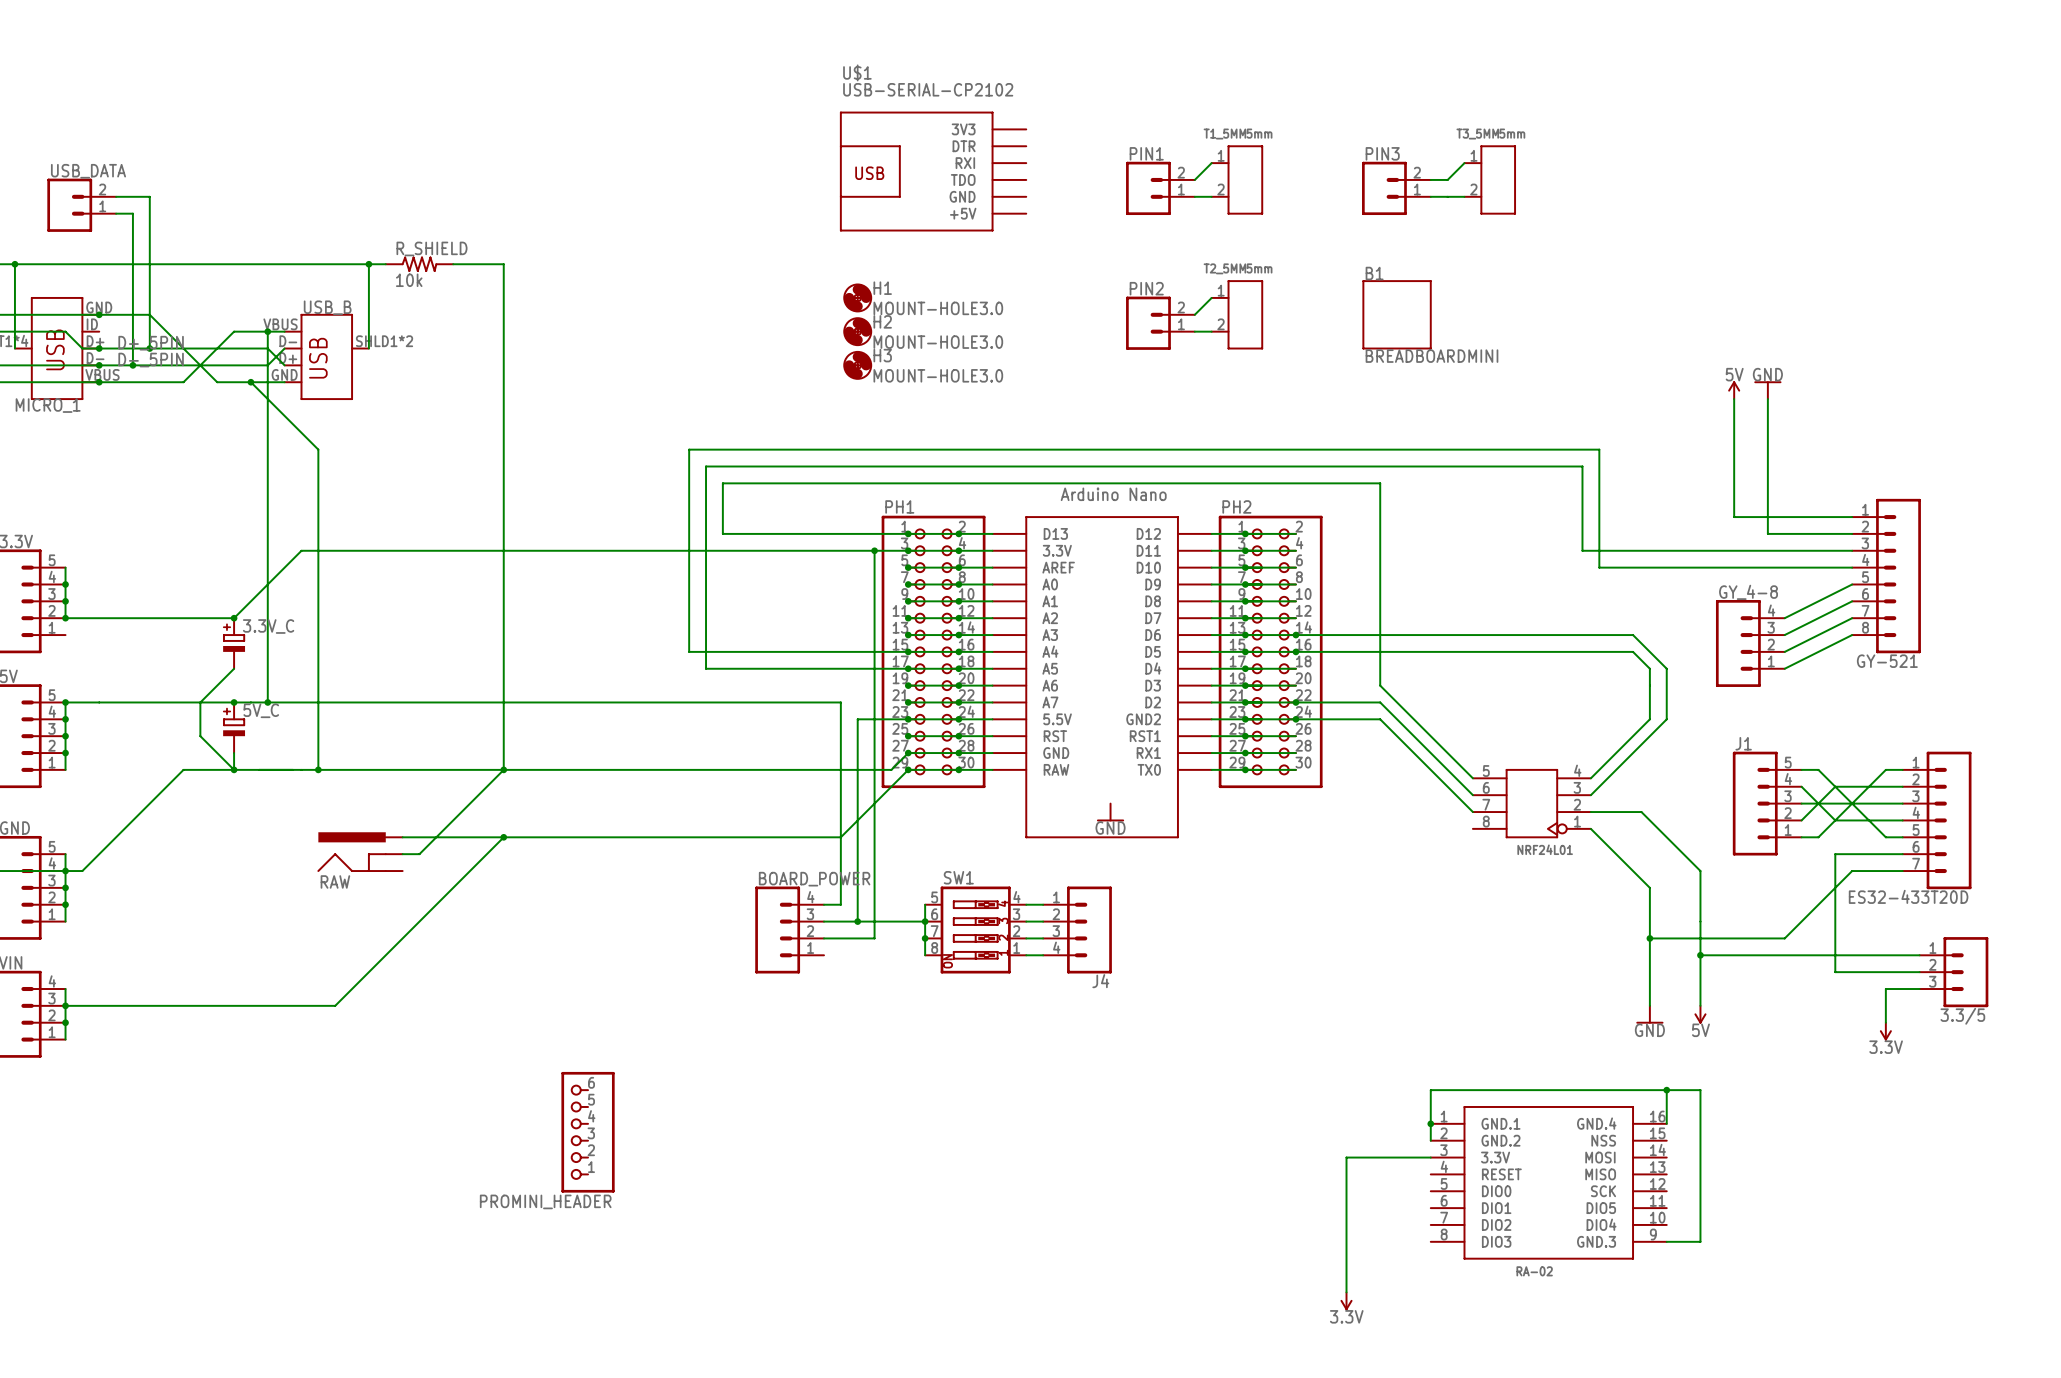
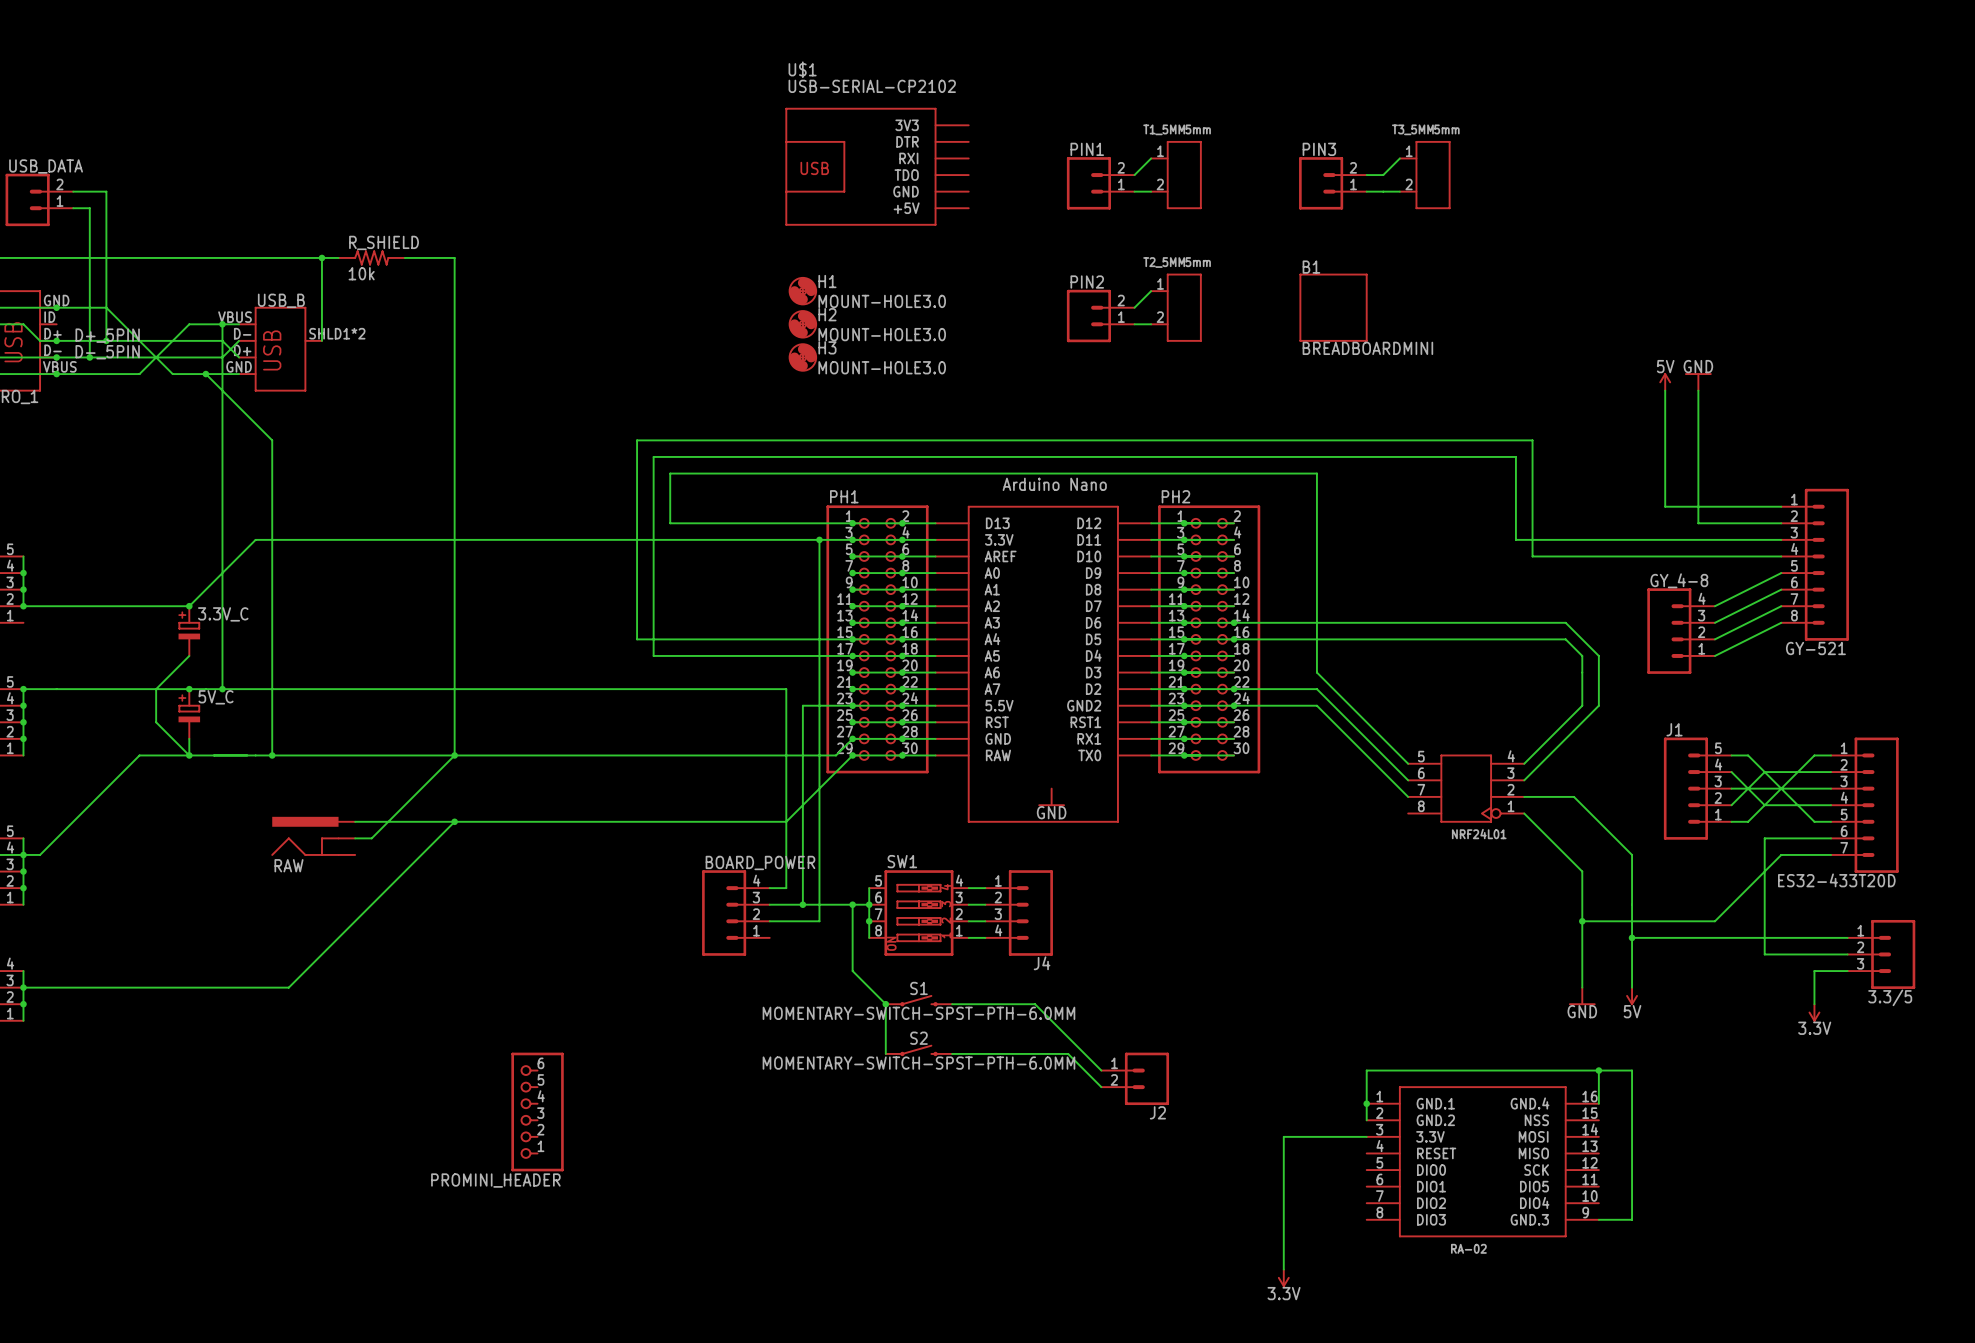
wire: none -> (852, 904) (852, 971) (885, 1004) (885, 1053)
junction: none -> (852, 904)
S1: none -> MOMENTARY-SWITCH-SPST-PTH-6.0MM (918, 1000)
junction: none -> (885, 1004)
wire: none -> (952, 1004) (1035, 1004) (1101, 1070)
S2: none -> MOMENTARY-SWITCH-SPST-PTH-6.0MM (918, 1050)
wire: none -> (952, 1053) (1068, 1053) (1101, 1087)
J2: none -> (1135, 1078)

